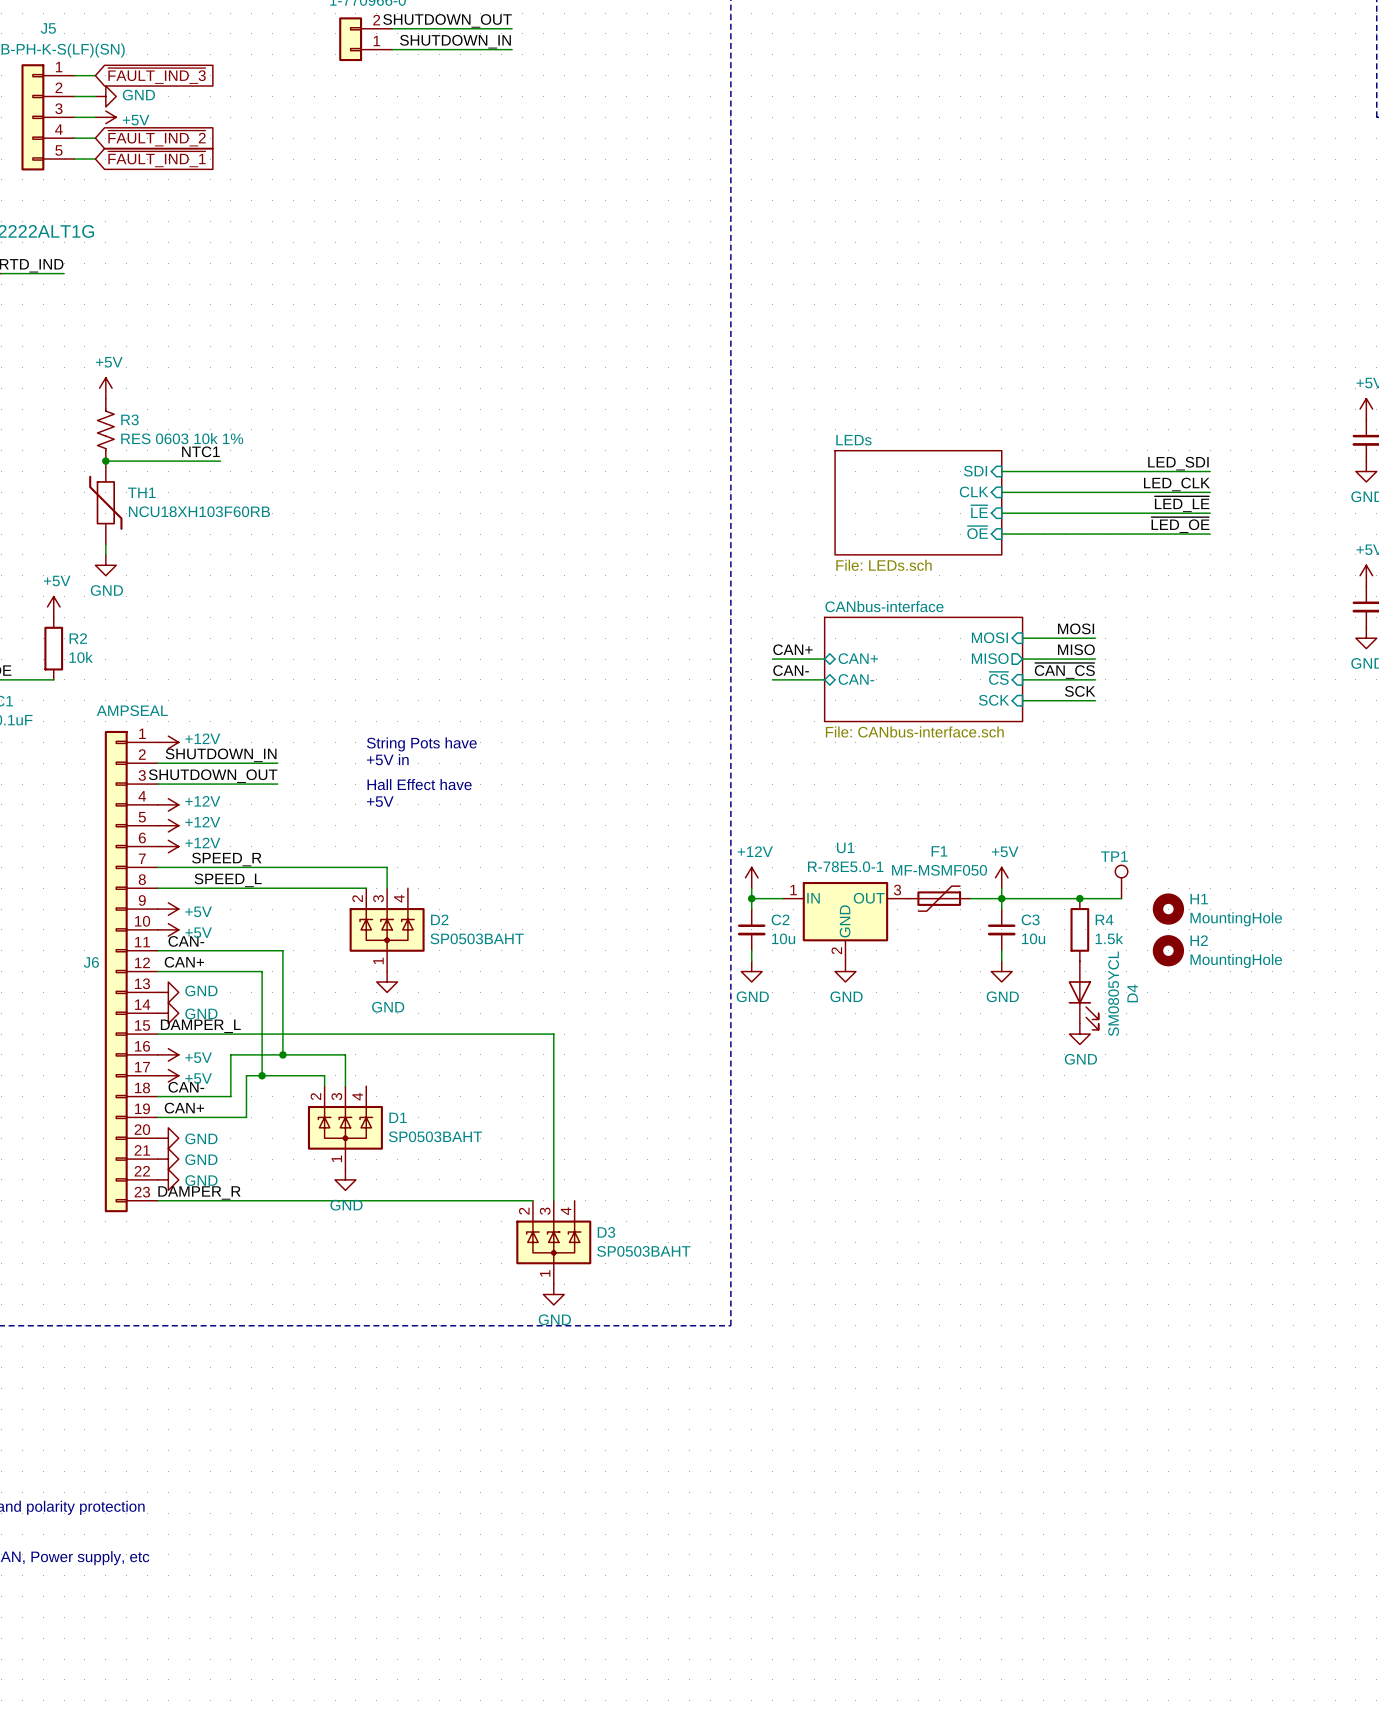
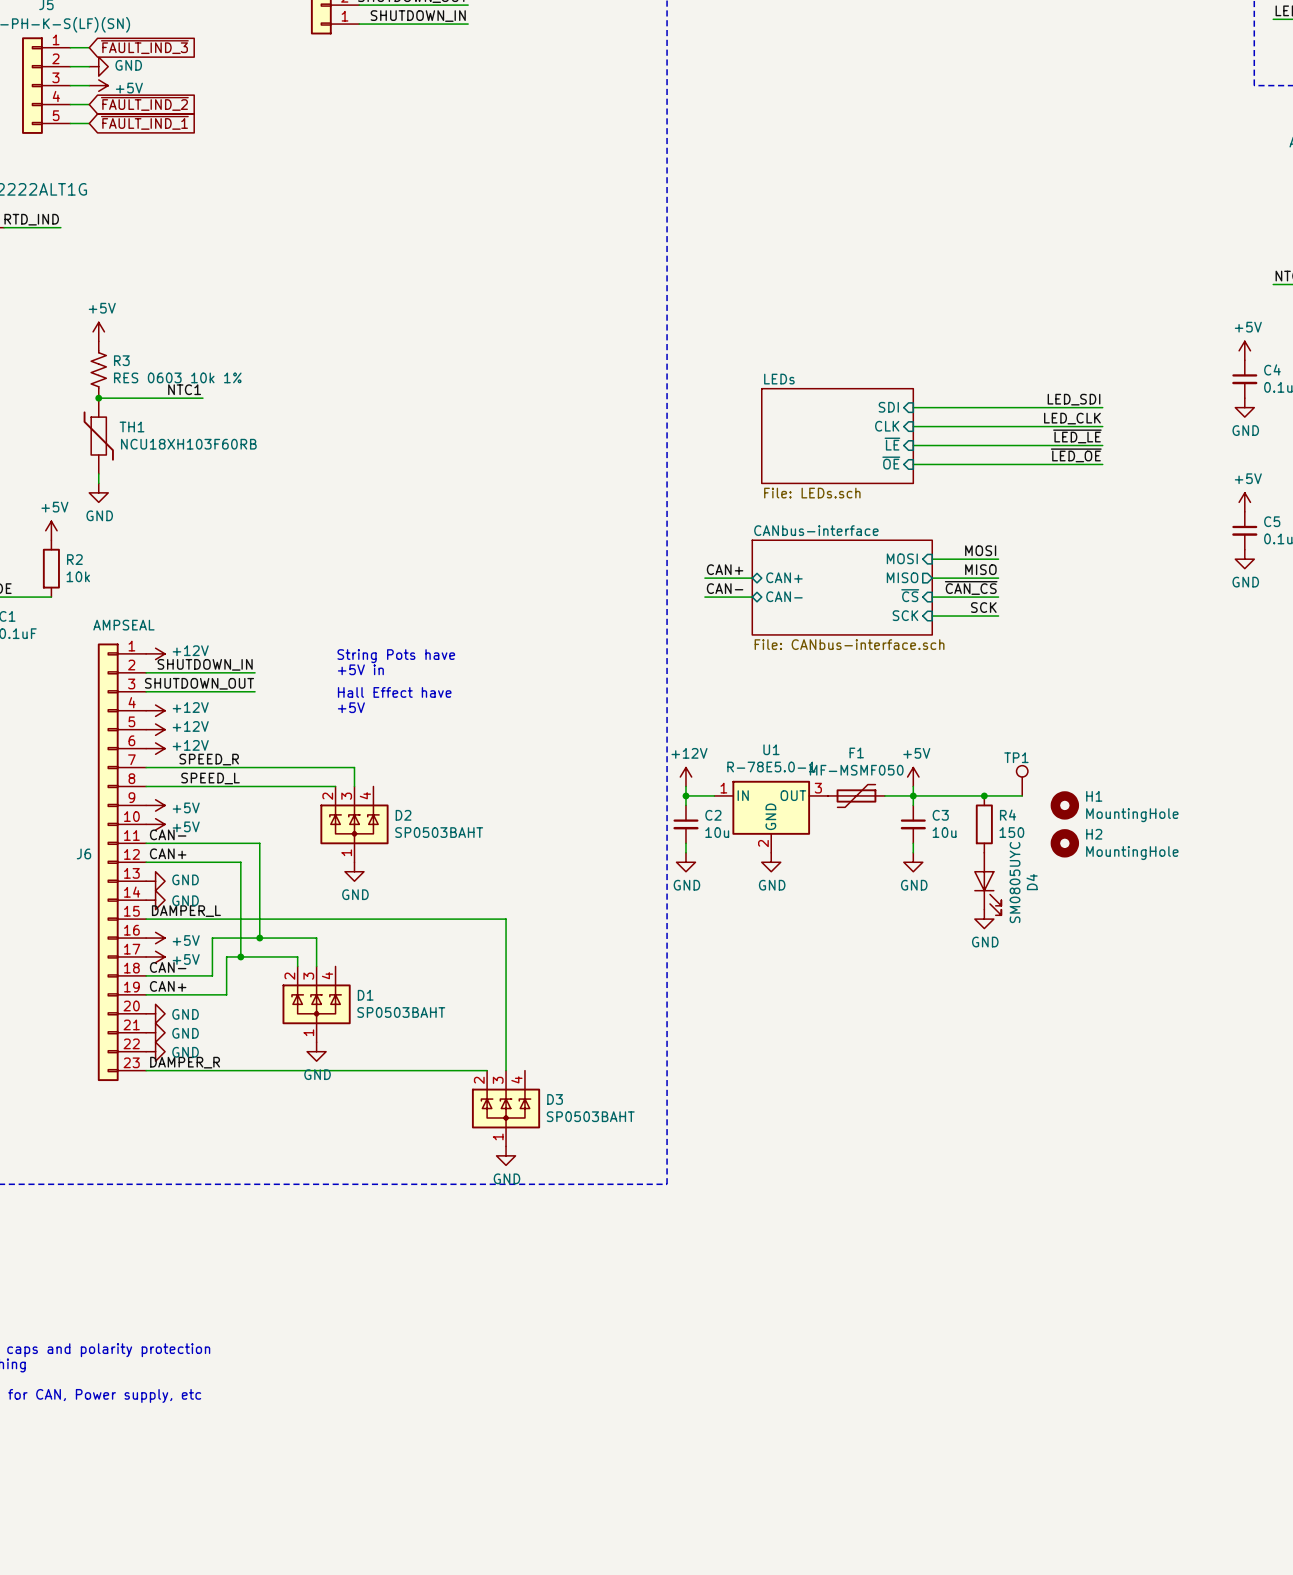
R4 value: 1.5k (1109, 938) -> 150 (1011, 832)
D4 value: SM0805YCL (1113, 993) -> SM0805UYC (1015, 882)

